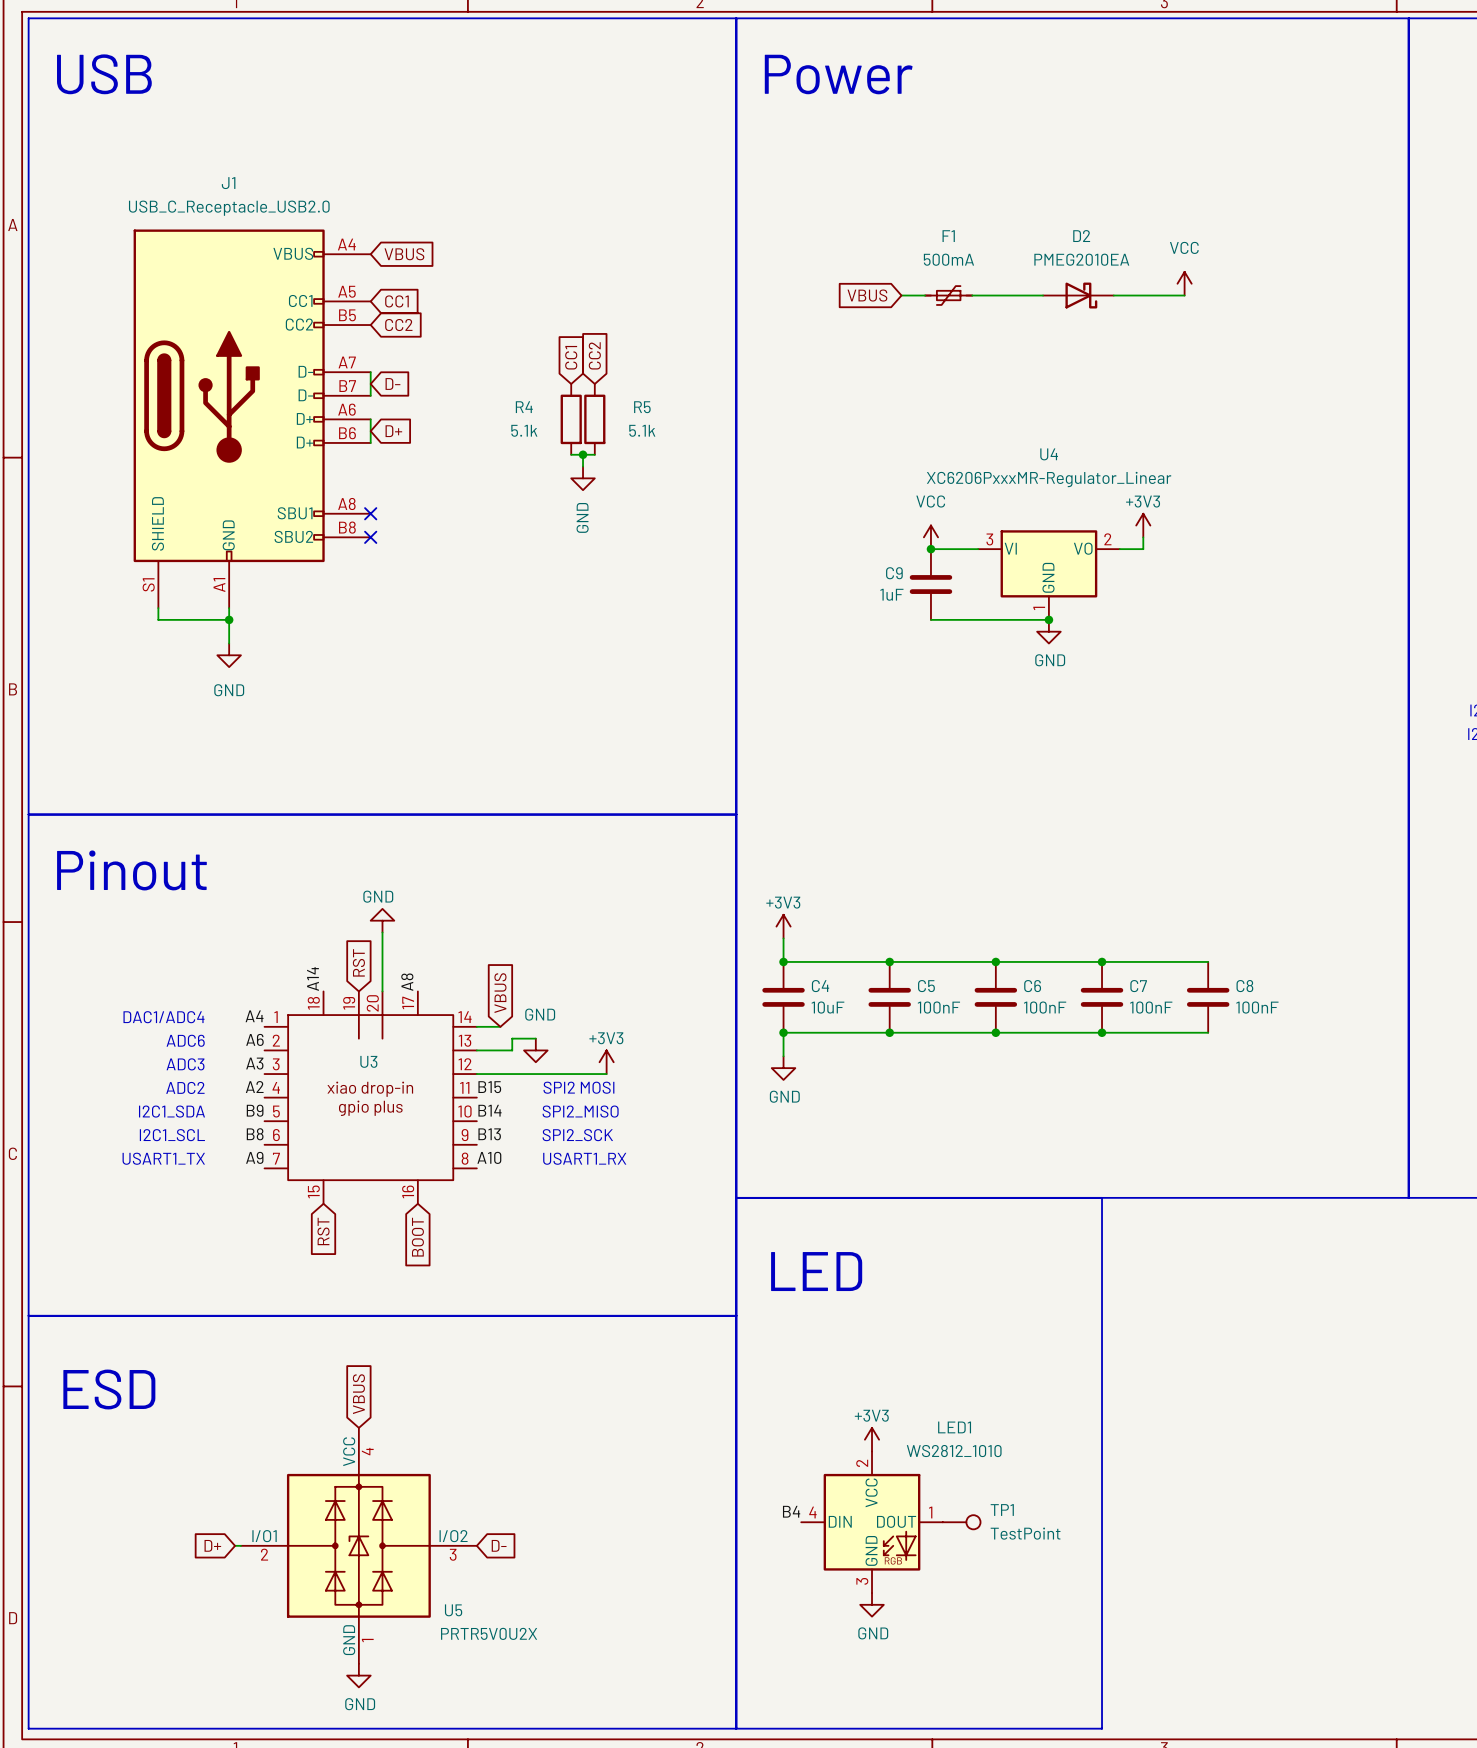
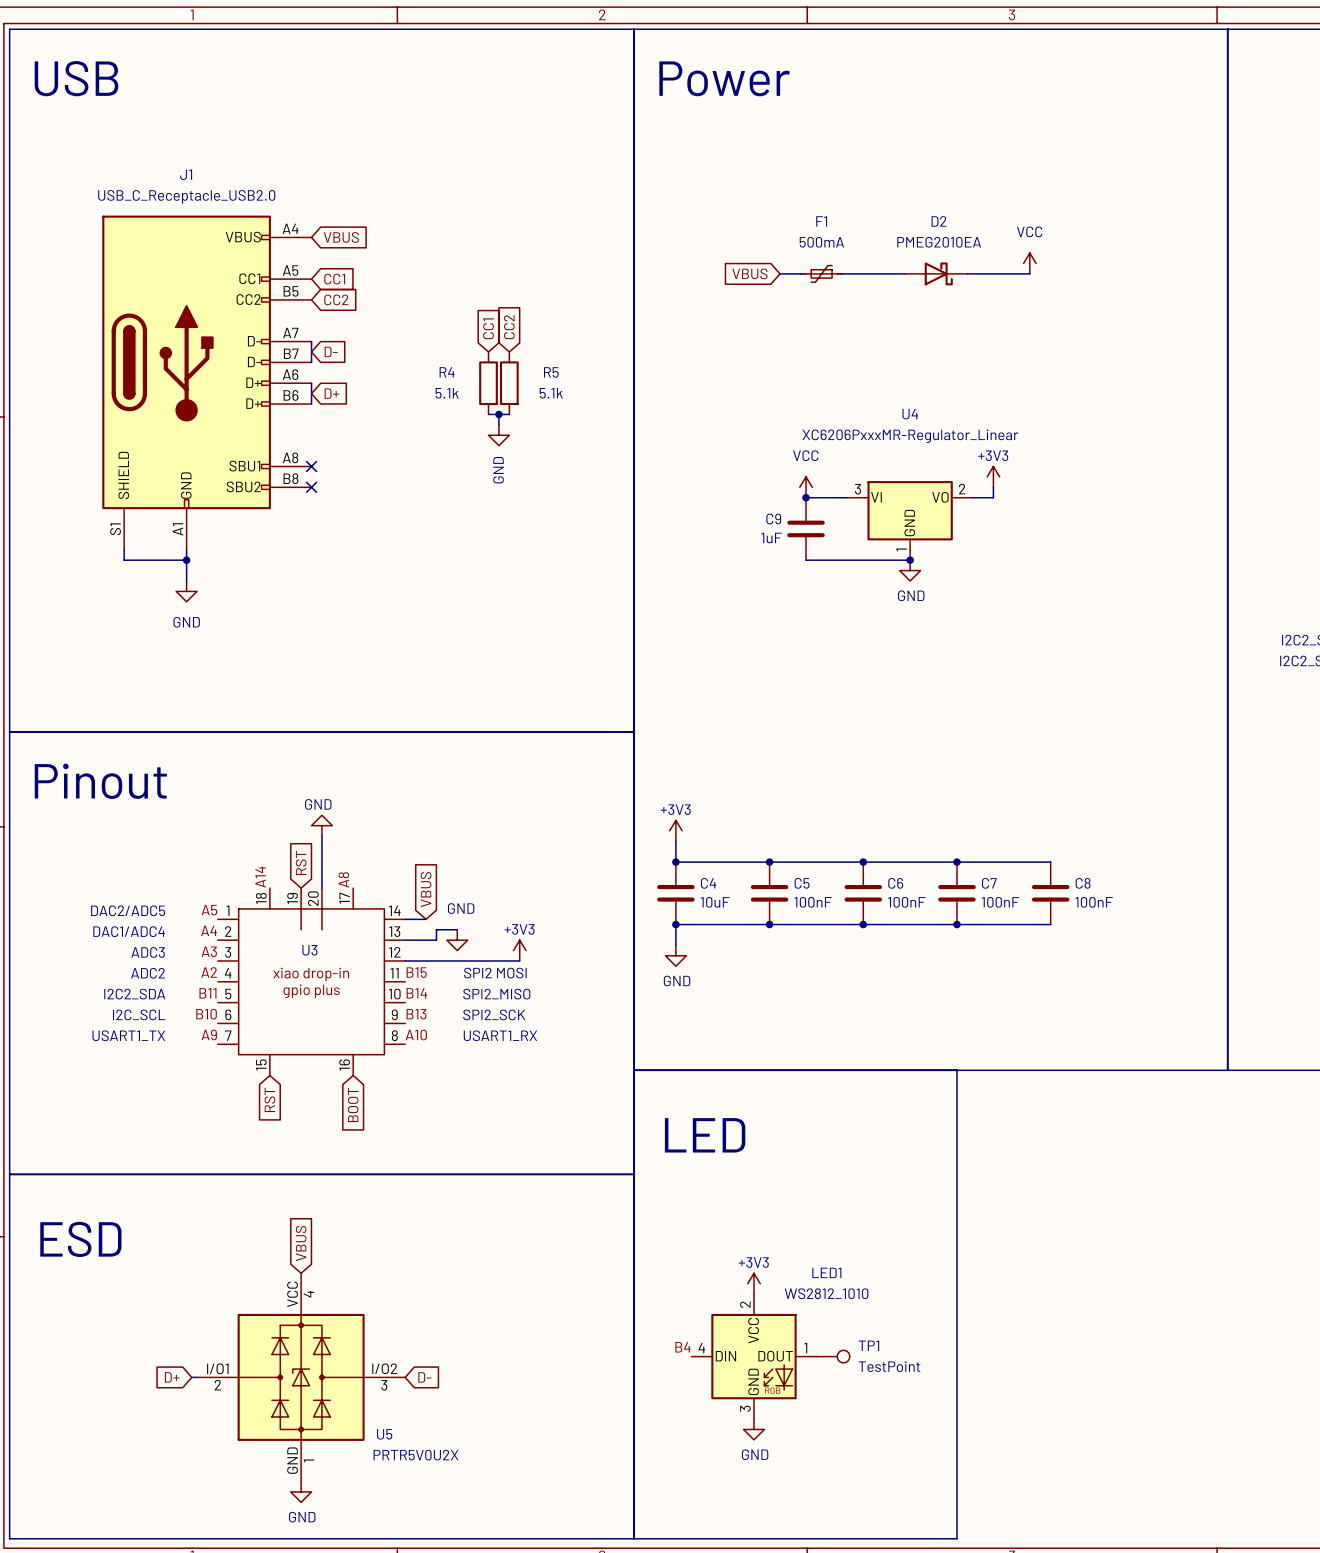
label: A4 (254, 1016) -> A5 (209, 910)
text: DAC1/ADC4 (164, 1017) -> DAC2/ADC5 (128, 910)
label: A6 (254, 1039) -> A4 (209, 930)
text: ADC6 (185, 1040) -> DAC1/ADC4 (129, 931)
label: B9 (255, 1110) -> B11 (207, 993)
text: I2C1_SDA (171, 1111) -> I2C2_SDA (134, 994)
label: B8 (255, 1134) -> B10 (206, 1014)
text: I2C1_SCL (172, 1135) -> I2C_SCL (139, 1014)

